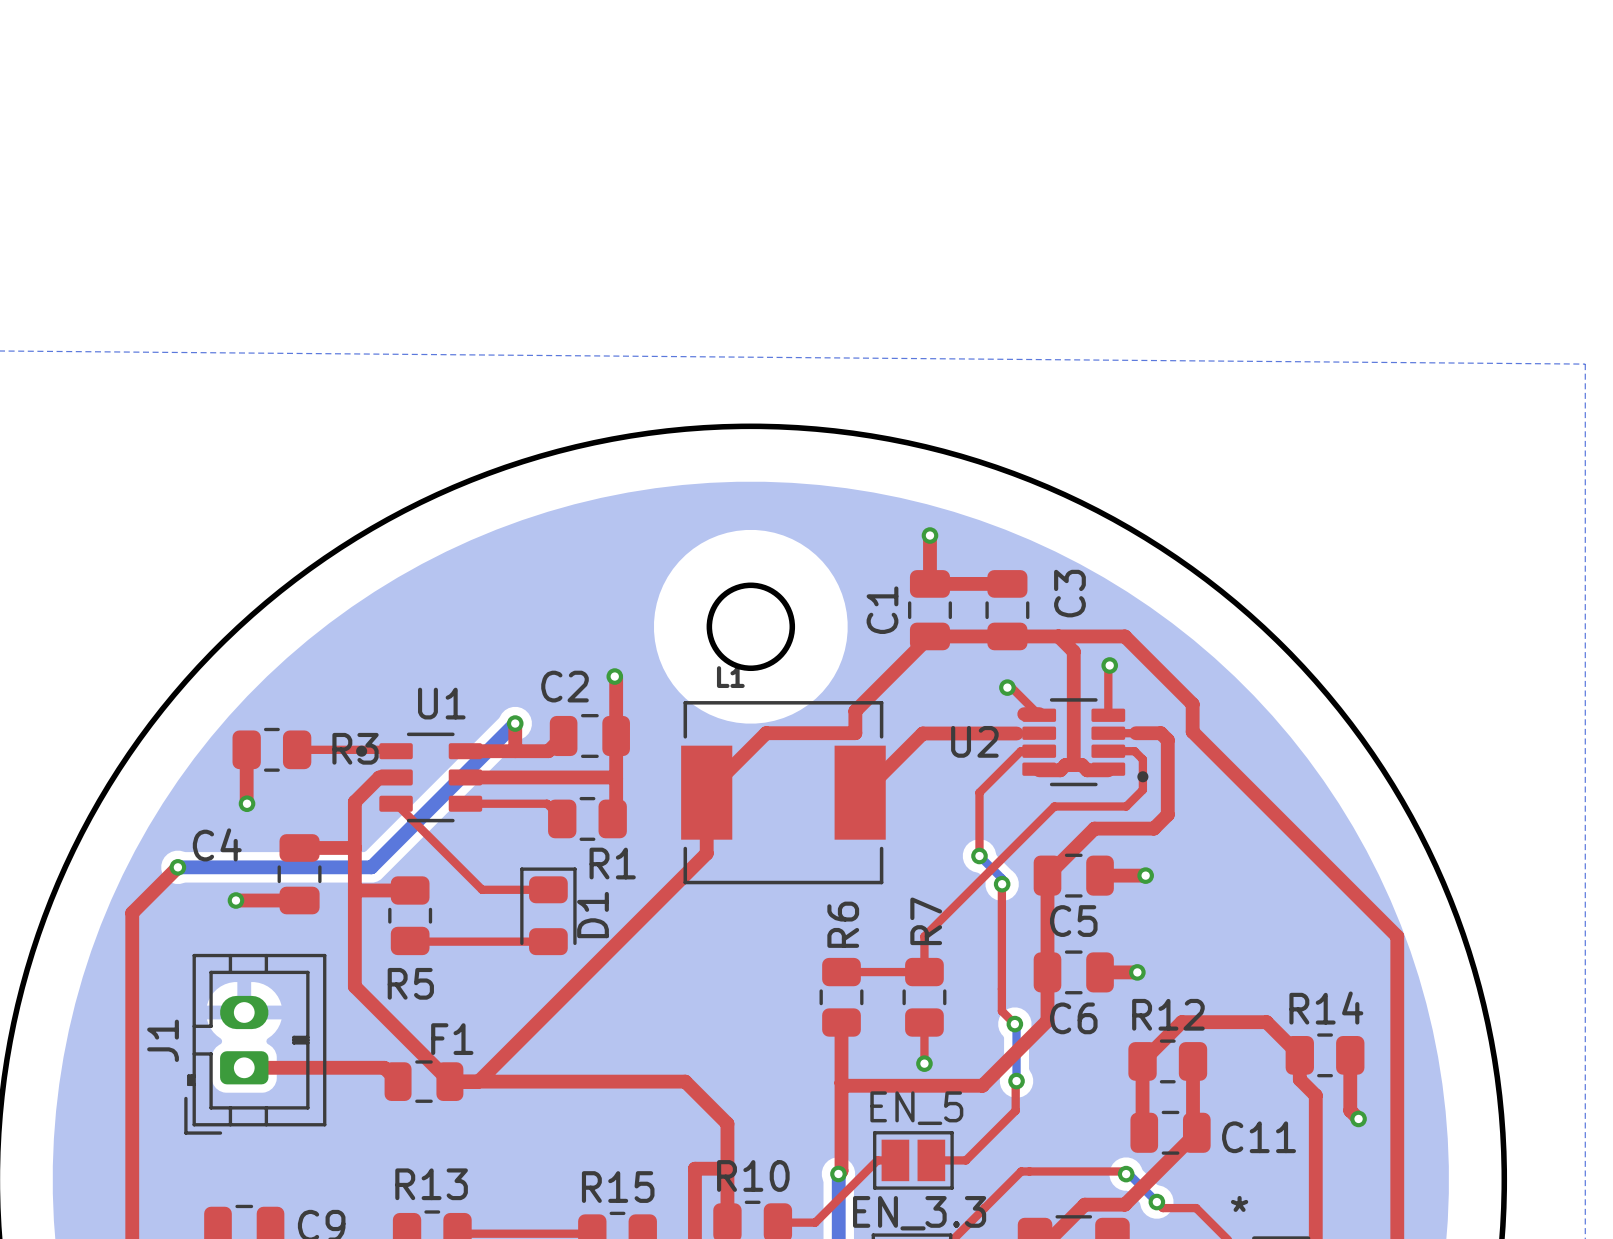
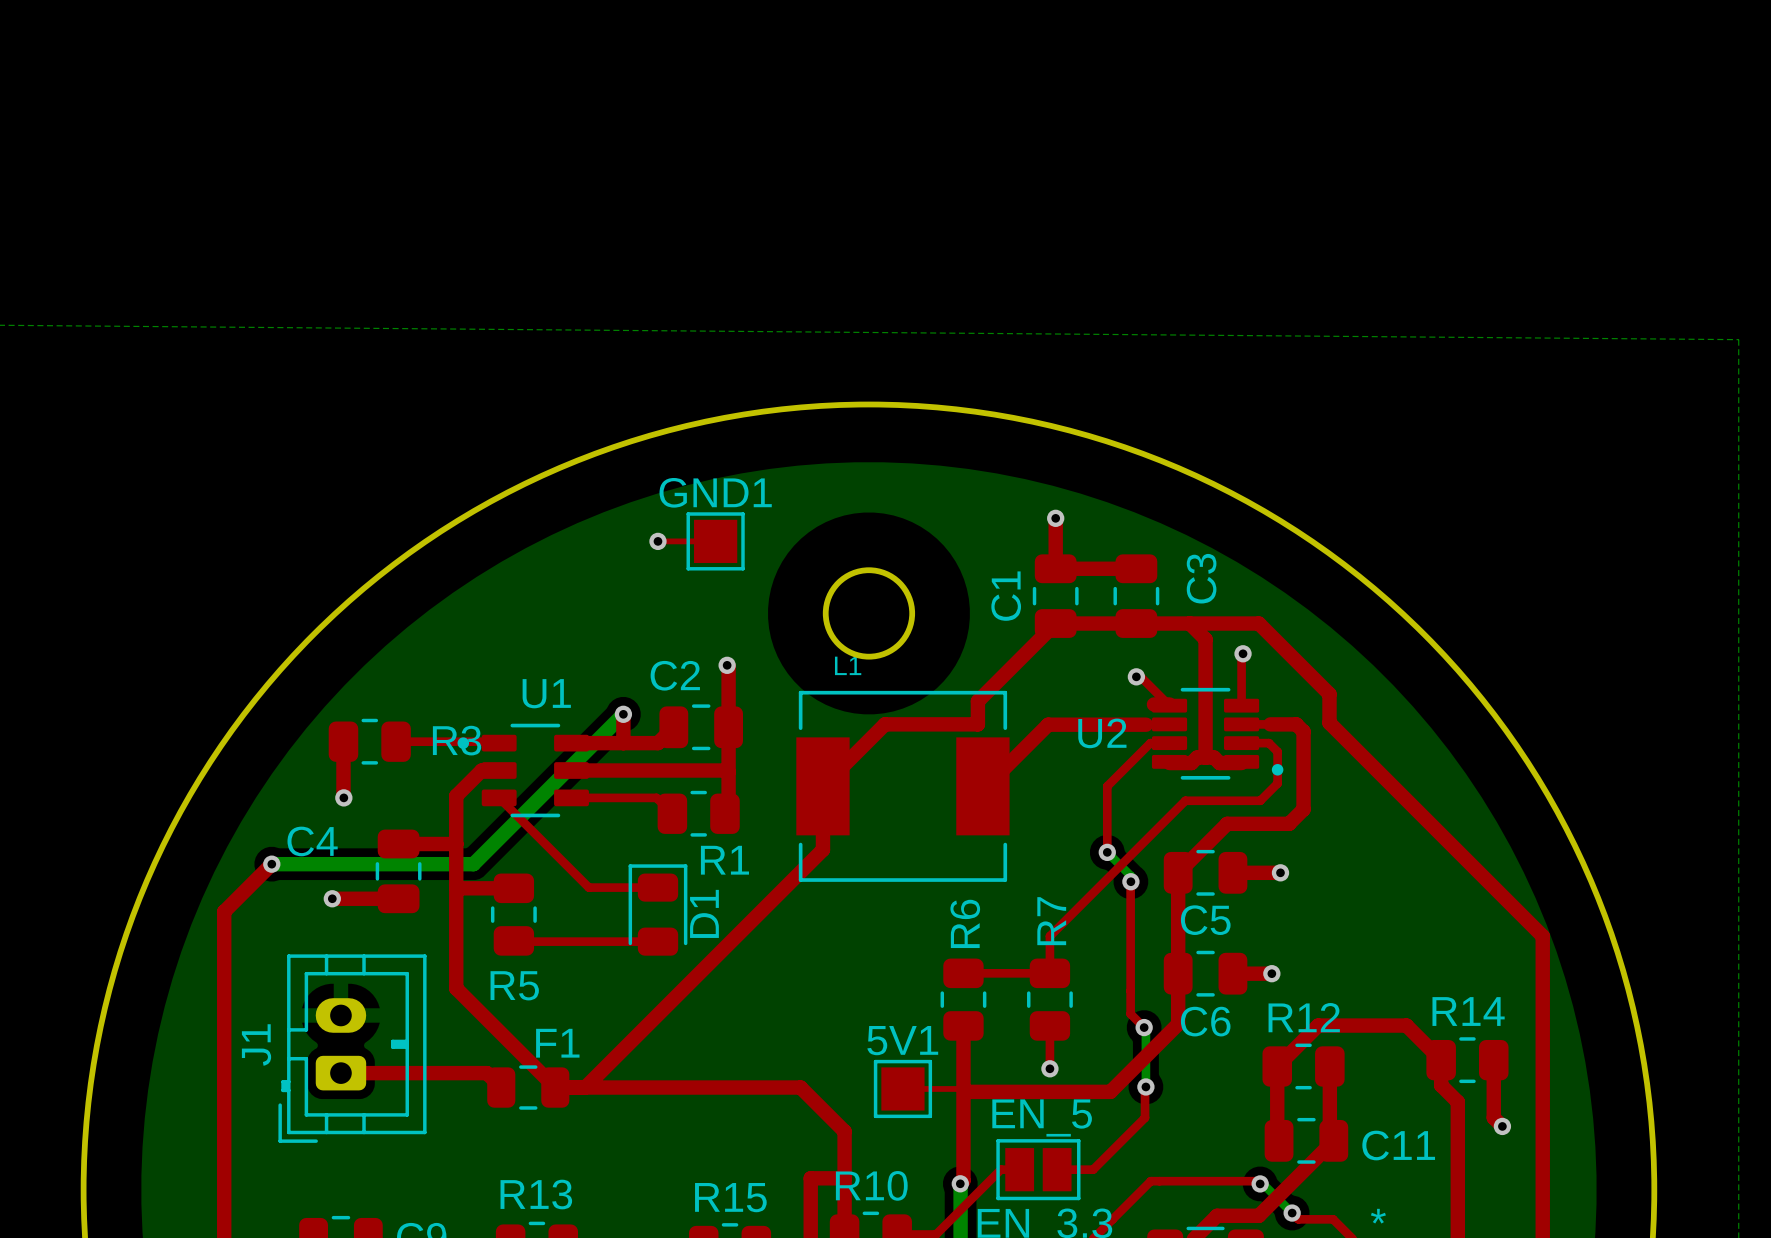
top track: none -> (657, 541) (715, 541)
via: none -> (657, 541)
GND1: none -> (715, 541)
top track: none -> (902, 1088) (963, 1088)
5V1: none -> (902, 1088)

